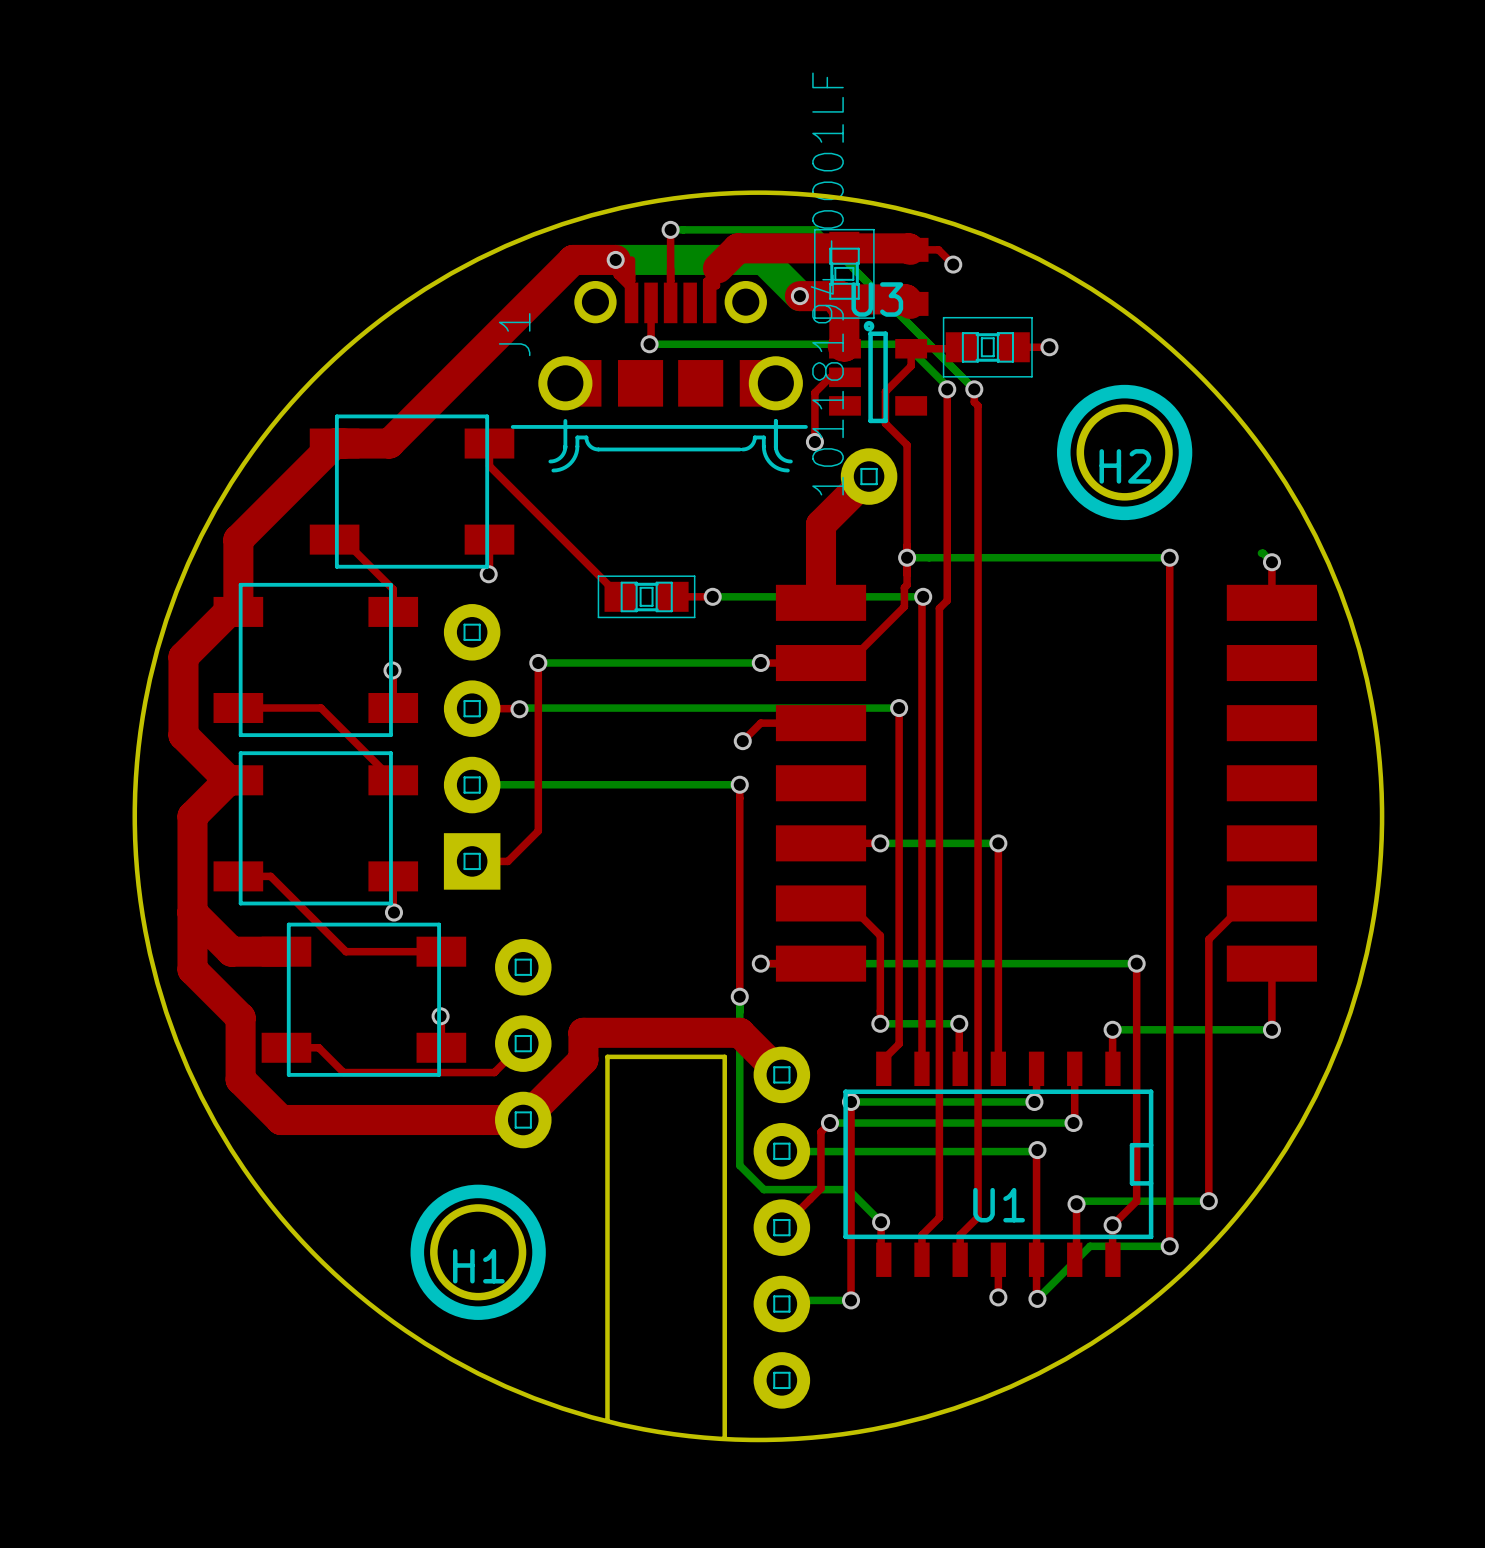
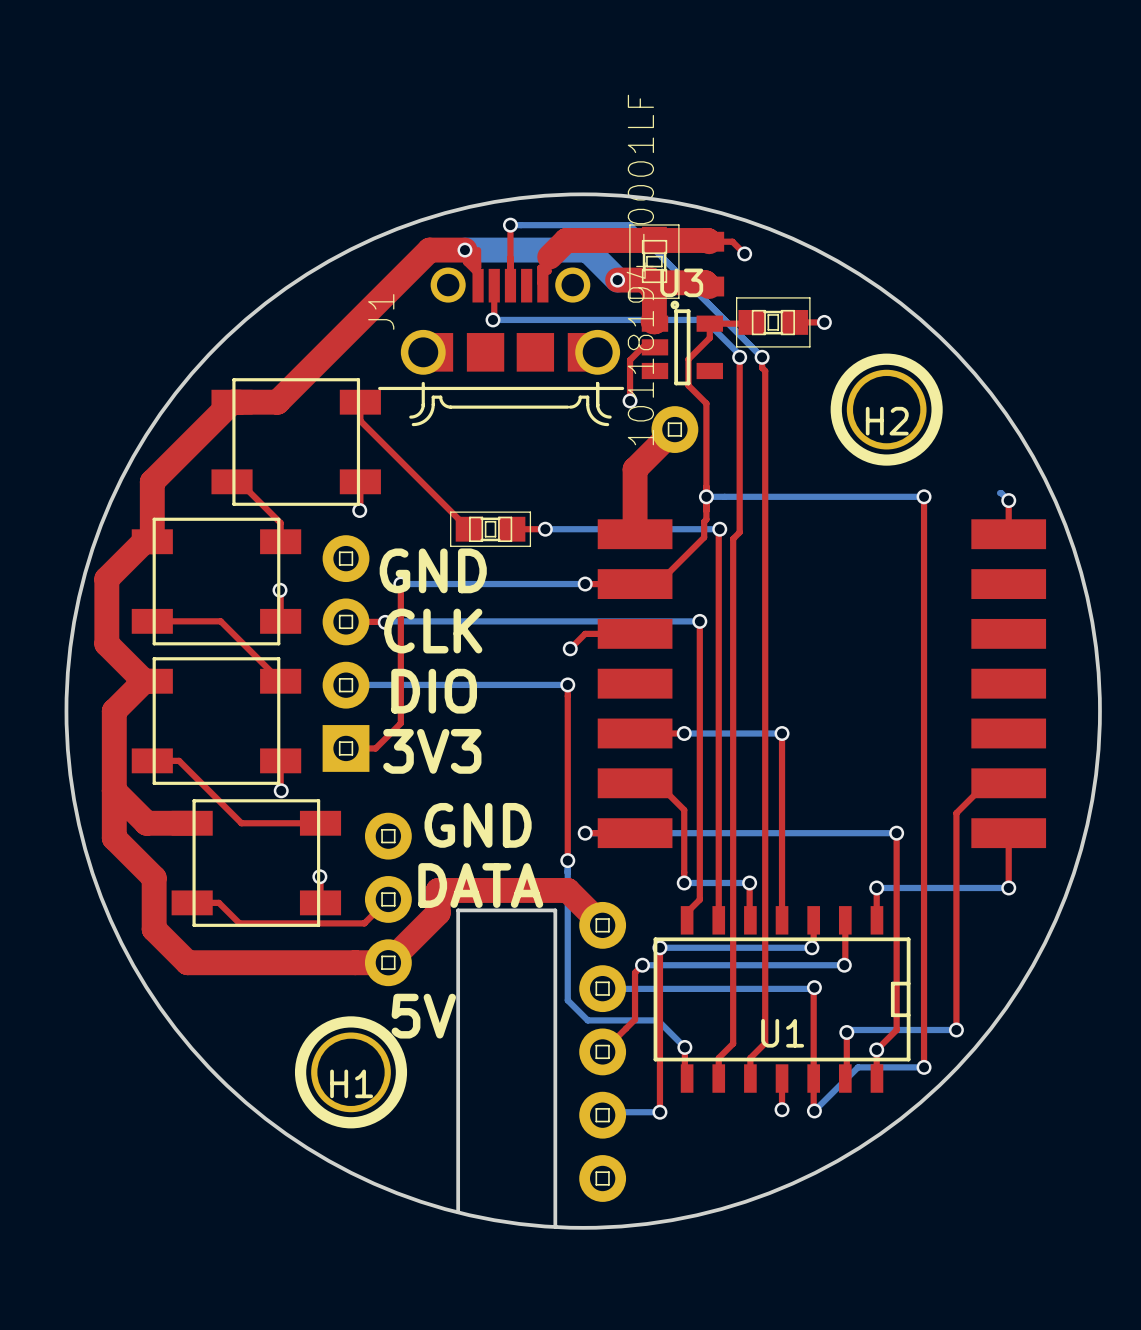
text: none -> GND (433, 570)
text: none -> CLK (433, 631)
text: none -> DIO (434, 691)
text: none -> 3V3 (432, 751)
text: none -> GND (478, 825)
text: none -> DATA (480, 885)
text: none -> 5V (423, 1016)

